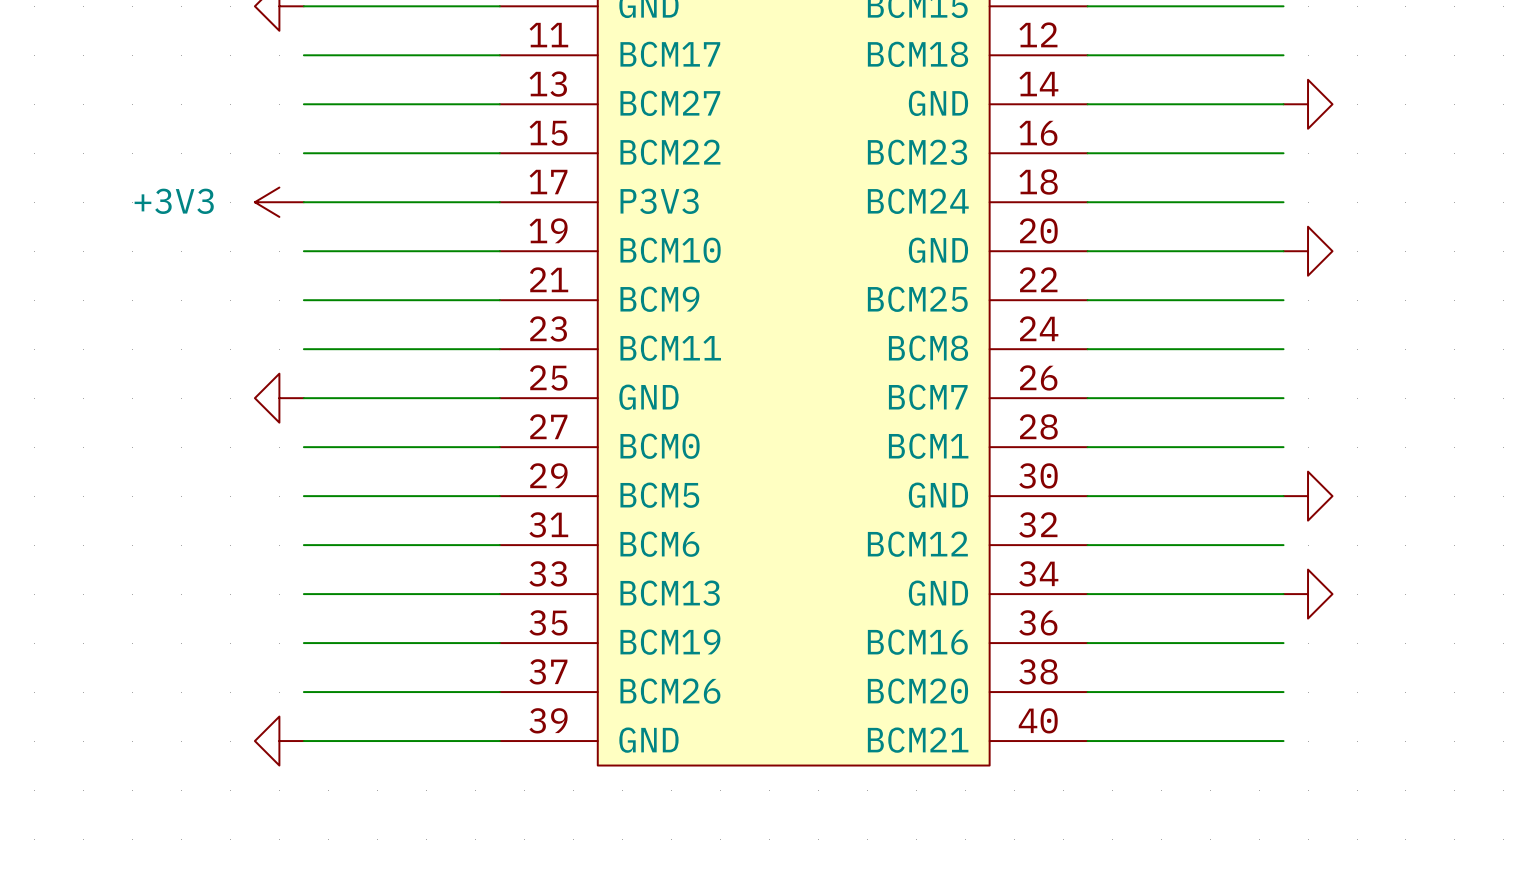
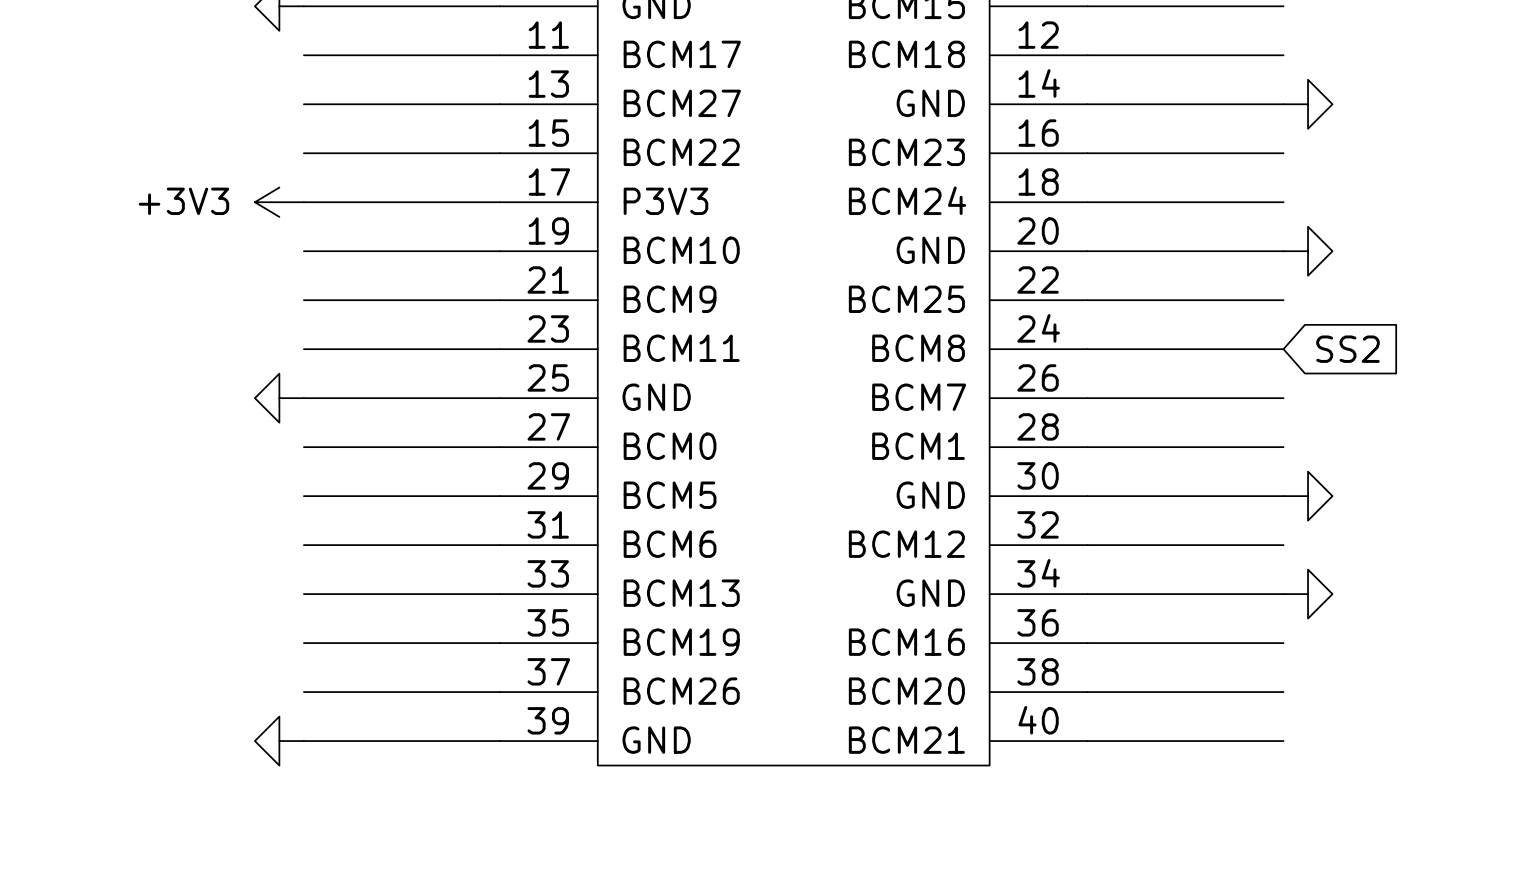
global label: none -> SS2 (1348, 349)

